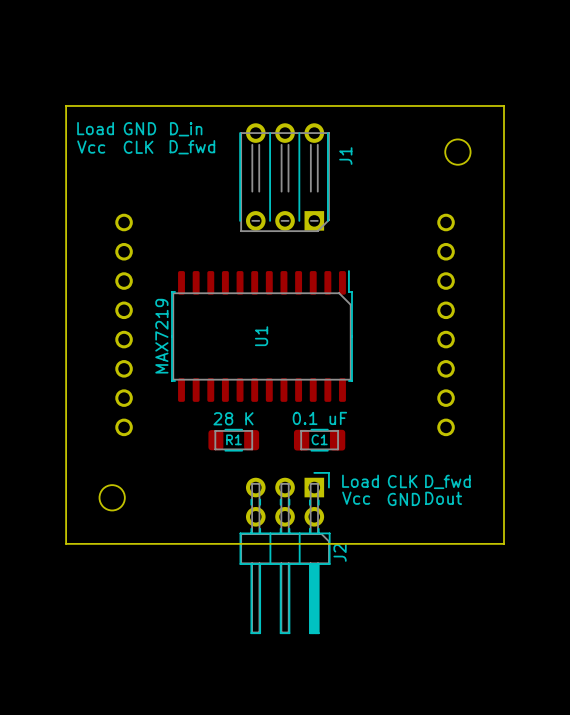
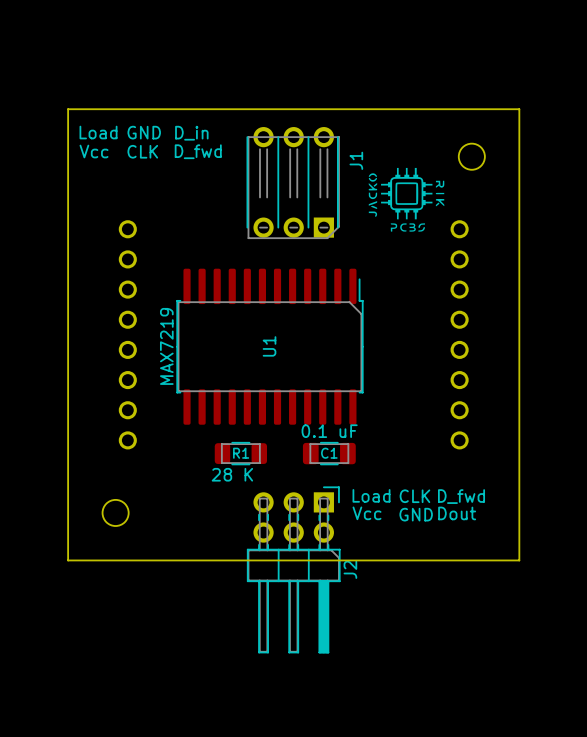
drawing: none -> [368, 167, 445, 232]
U1 footprint: [171, 270, 353, 402] -> [176, 268, 364, 425]
R1 value position: 28 K (233, 418) -> 28 K (232, 474)

